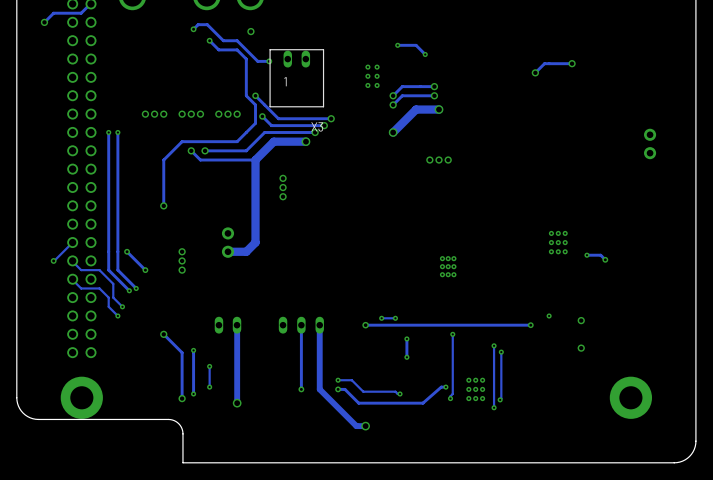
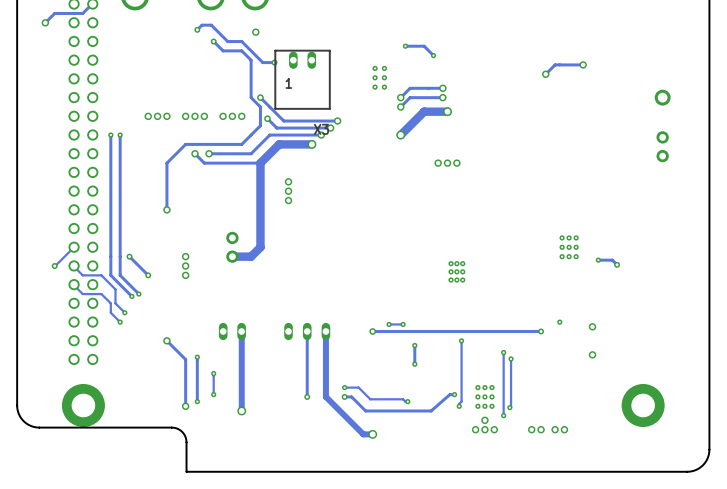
part: none -> (662, 97)
via: none -> (484, 420)
via: none -> (475, 429)
via: none -> (484, 429)
via: none -> (494, 429)
via: none -> (531, 429)
via: none -> (541, 429)
via: none -> (555, 429)
via: none -> (564, 429)

